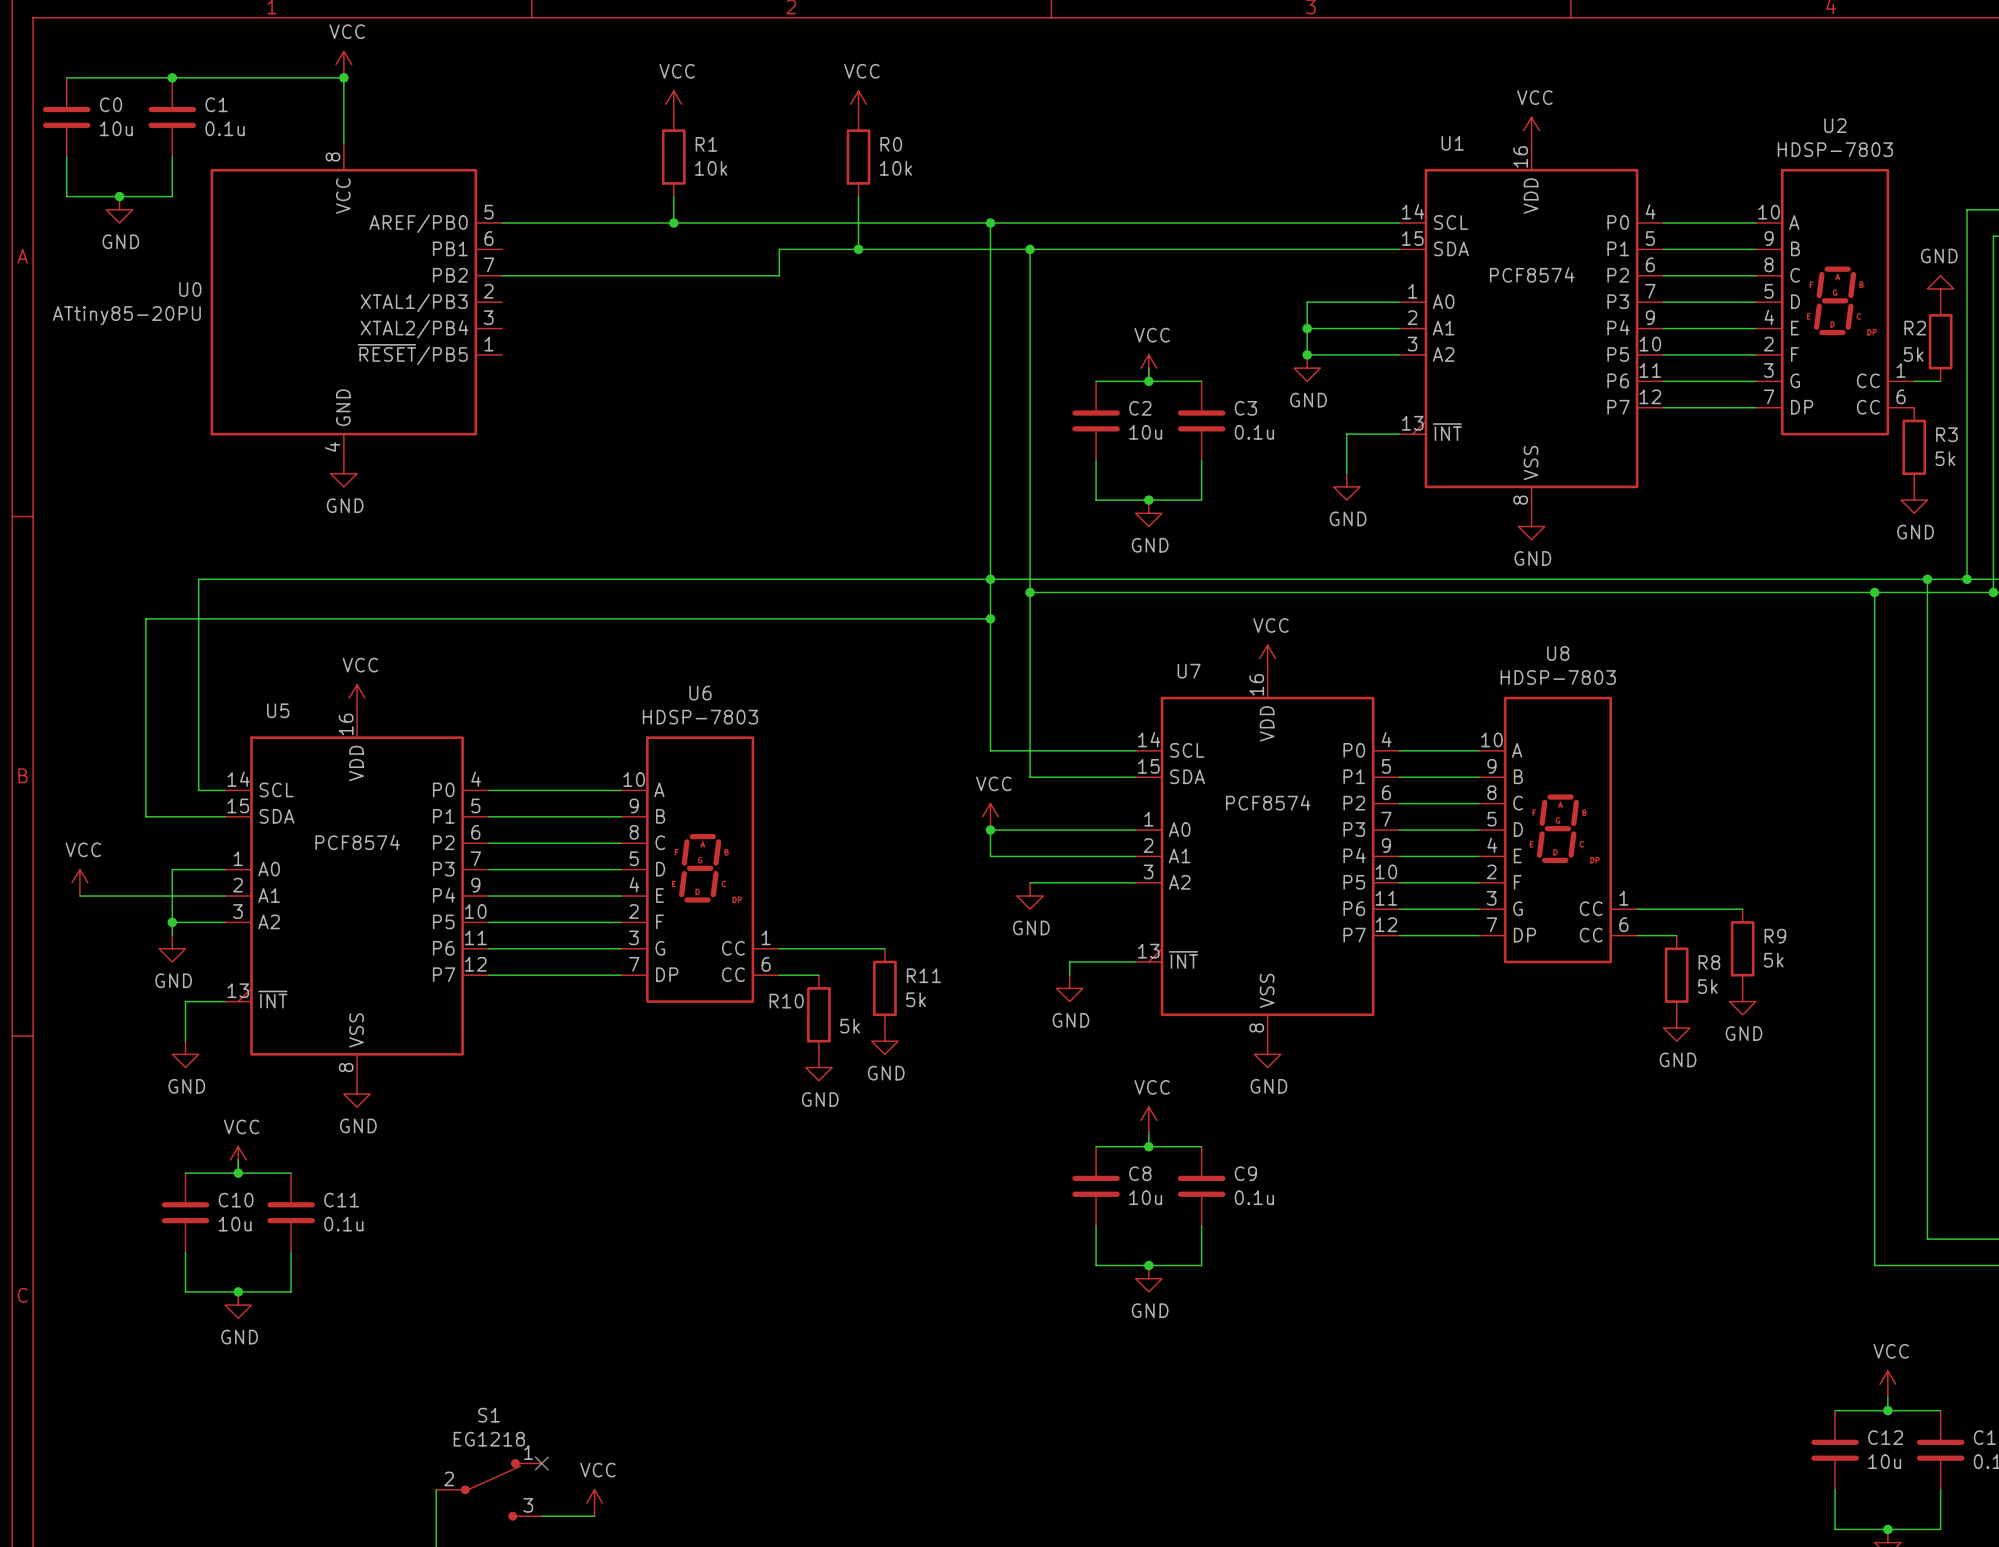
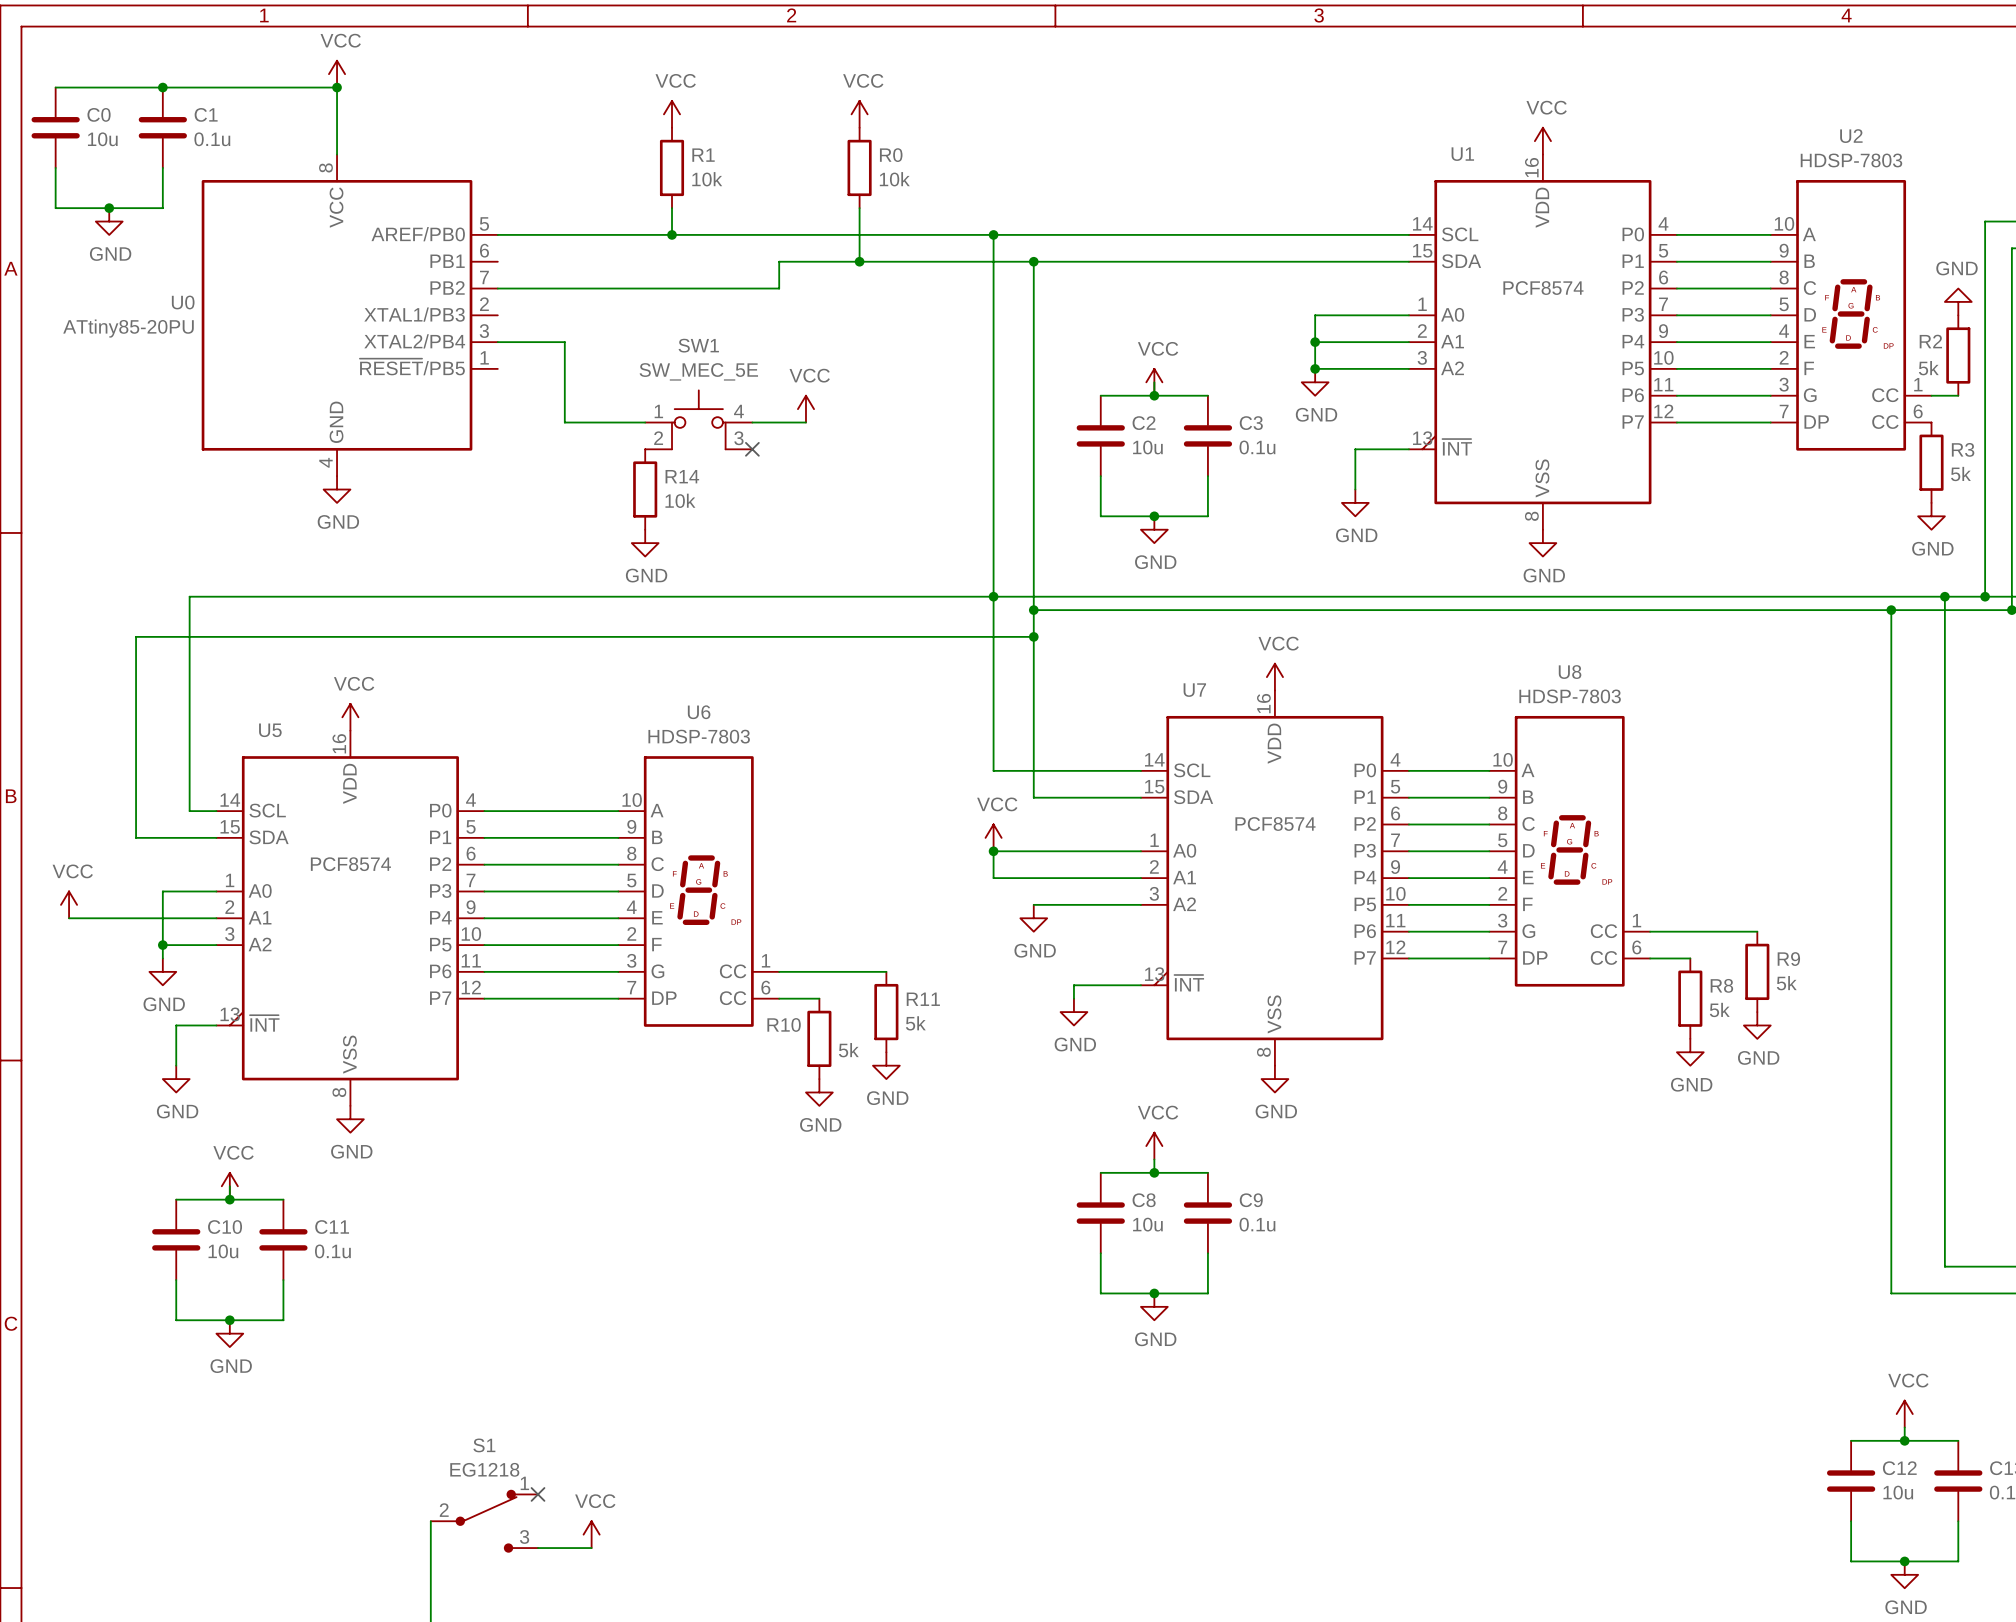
wire: none -> (497, 342) (564, 342) (564, 422) (645, 422)
power symbol: none -> VCC (805, 409)
SW1: none -> SW_MEC_5E (698, 419)
wire: none -> (752, 422) (805, 422)
no-connect mark: none -> (752, 449)
R14: none -> 10k (645, 489)
power symbol: none -> GND (645, 543)
wire: none -> (993, 636) (1033, 636)
junction position: (990, 618) -> (1033, 636)

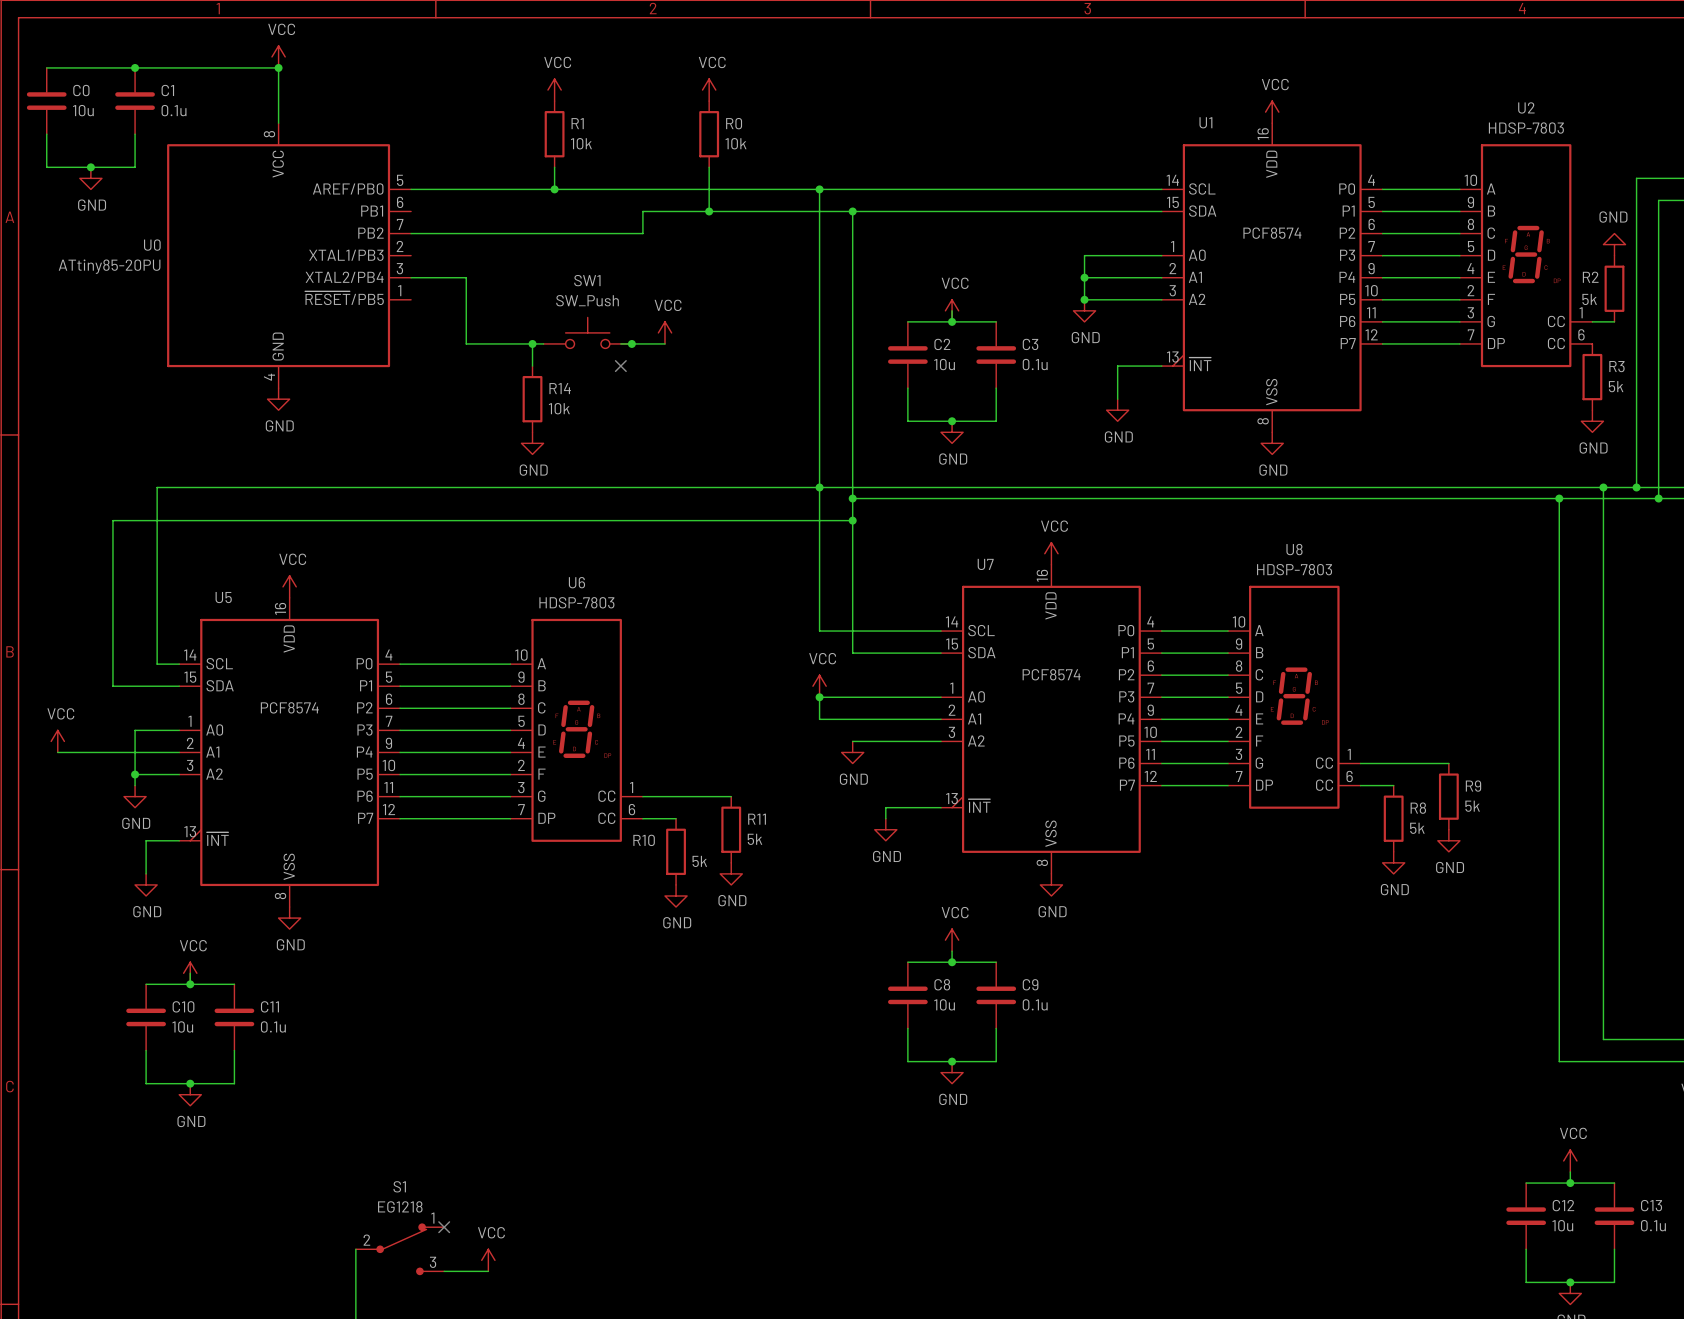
SW1 value: SW_MEC_5E (698, 371) -> SW_Push (587, 300)
SW1 symbol: [645, 390, 753, 450] -> [543, 317, 632, 349]
junction: none -> (532, 343)
wire: none -> (543, 343) (532, 343) (532, 366)
junction: none -> (631, 343)

